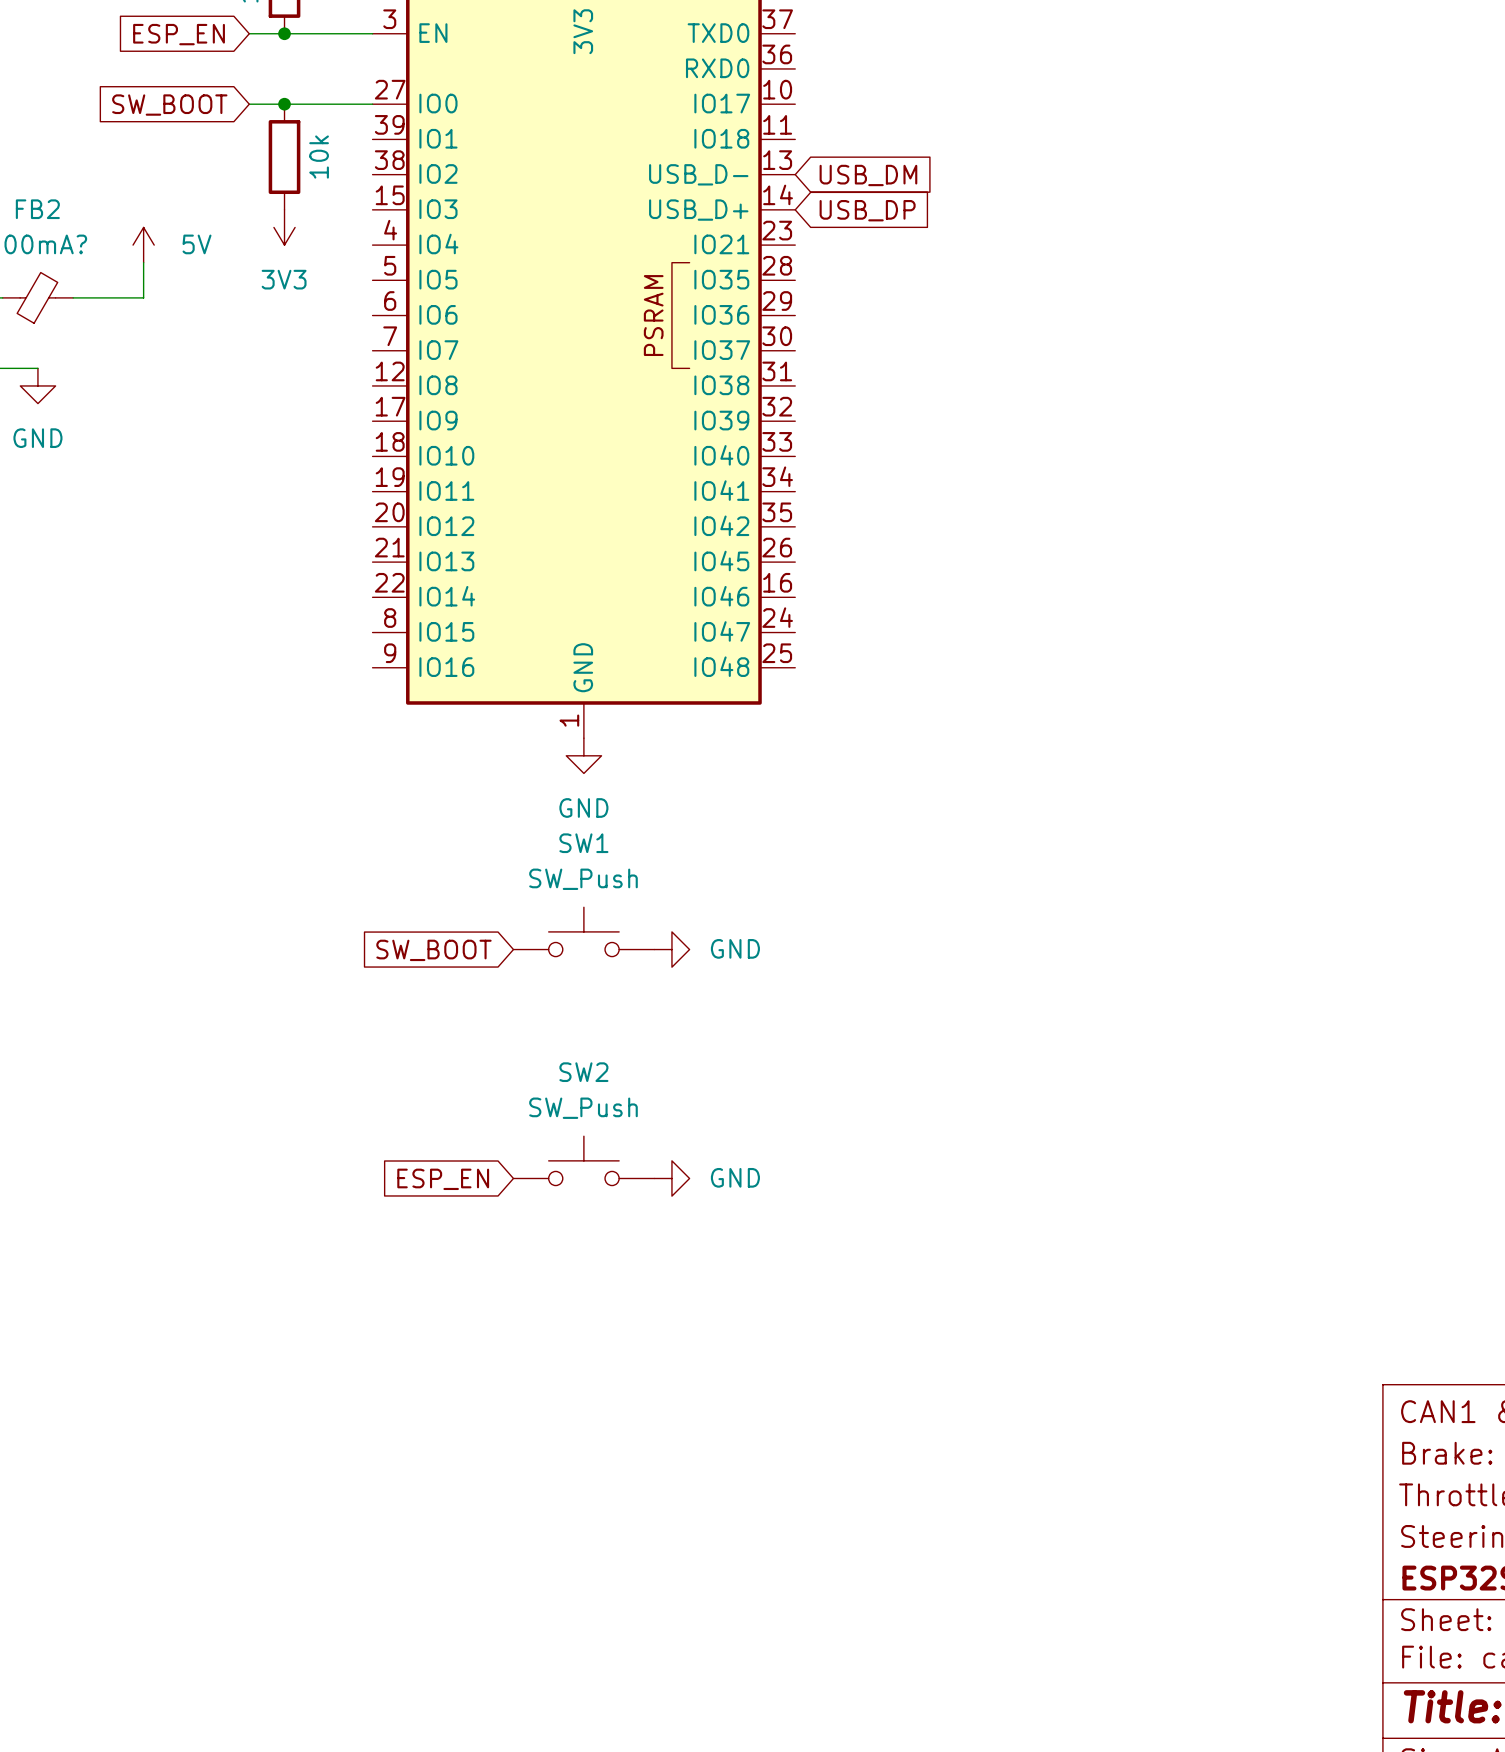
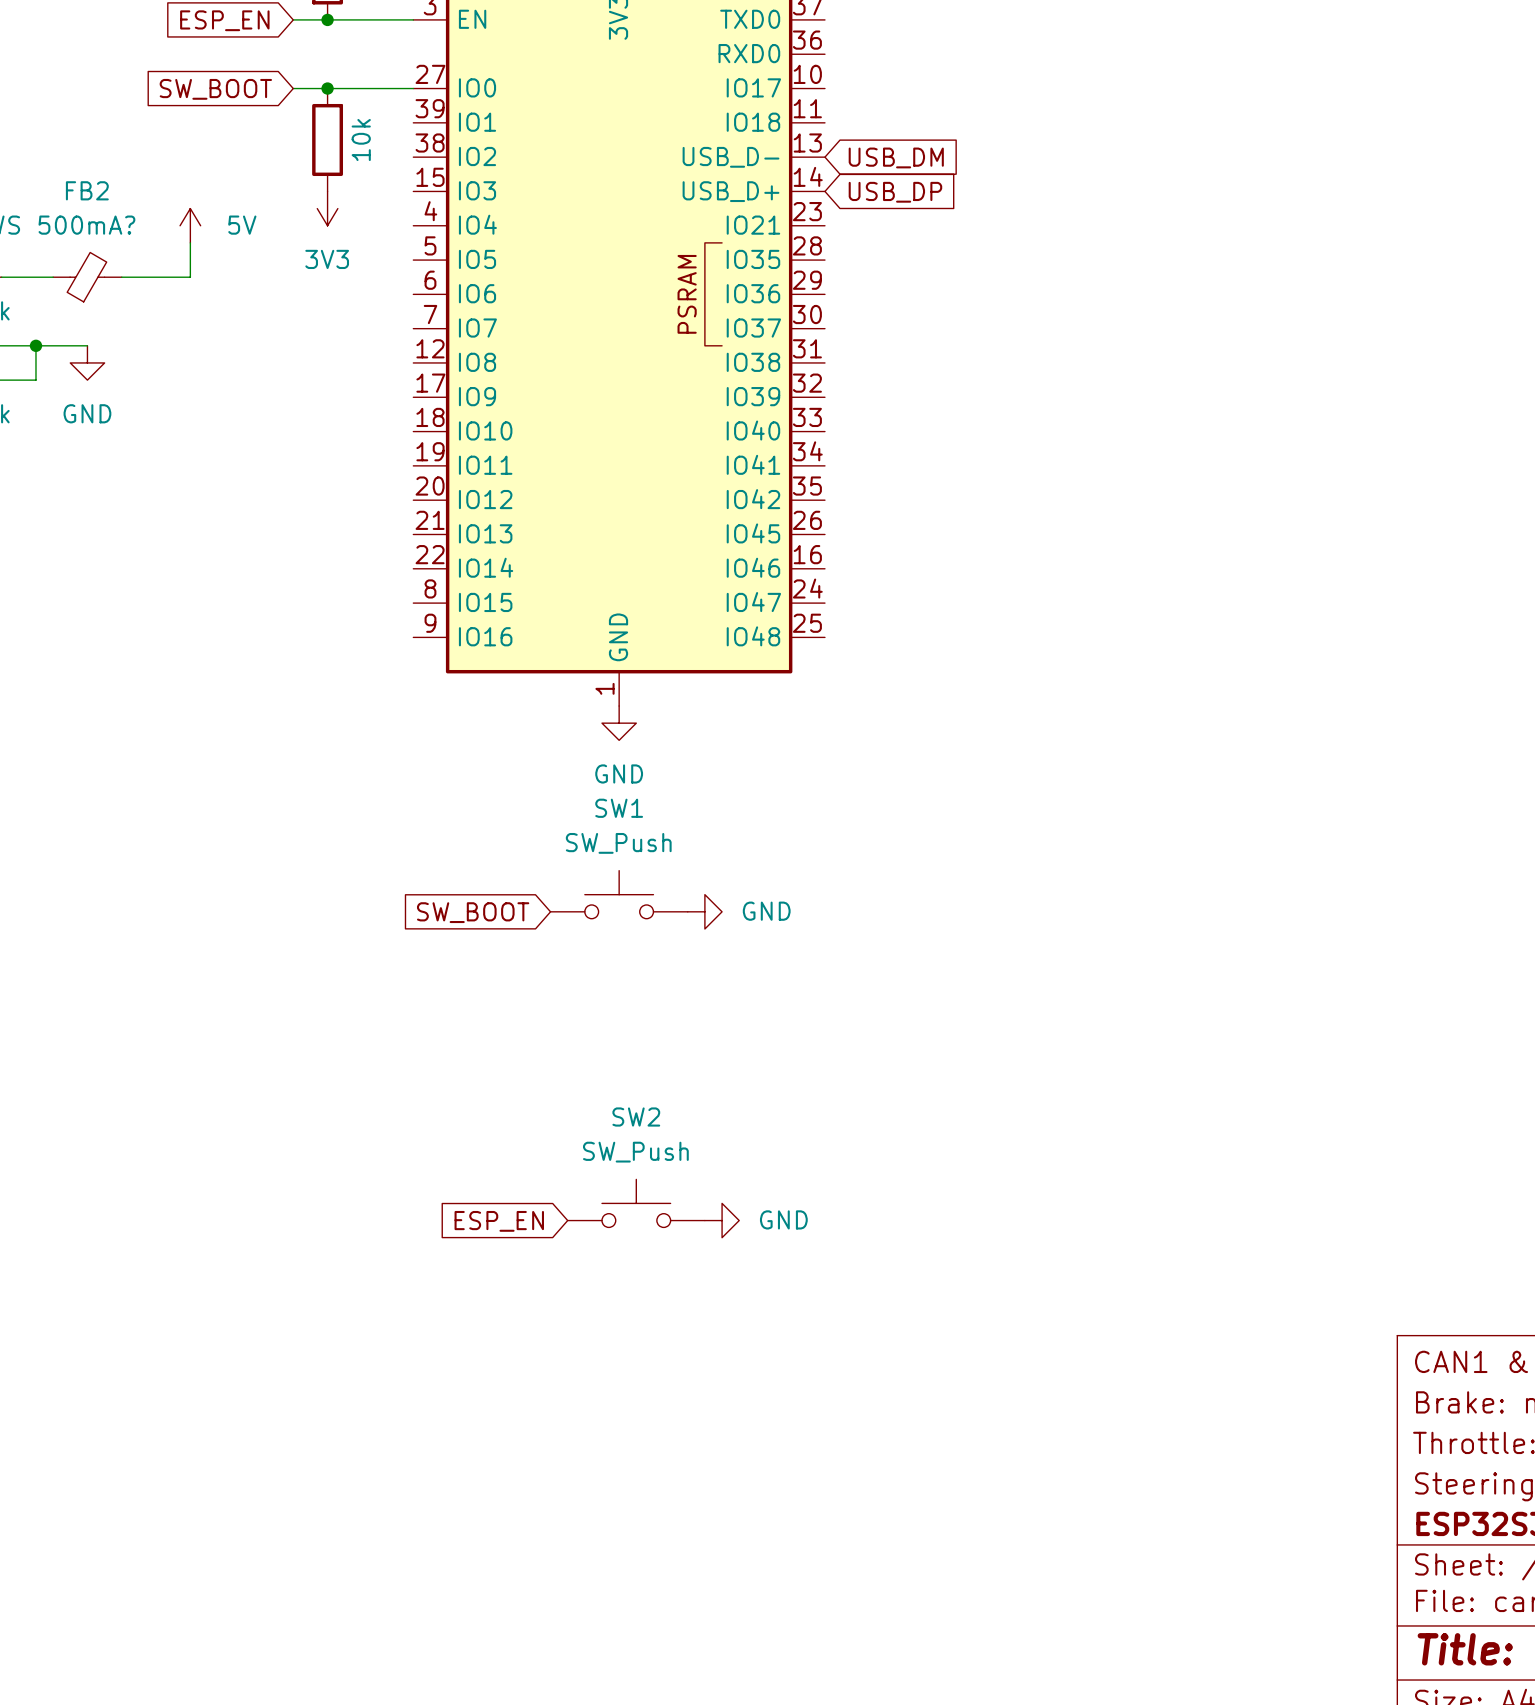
SW2 position: (583, 1160) -> (636, 1203)
power symbol position: GND (671, 1178) -> GND (722, 1220)
global label position: ESP_EN (443, 1179) -> ESP_EN (499, 1221)

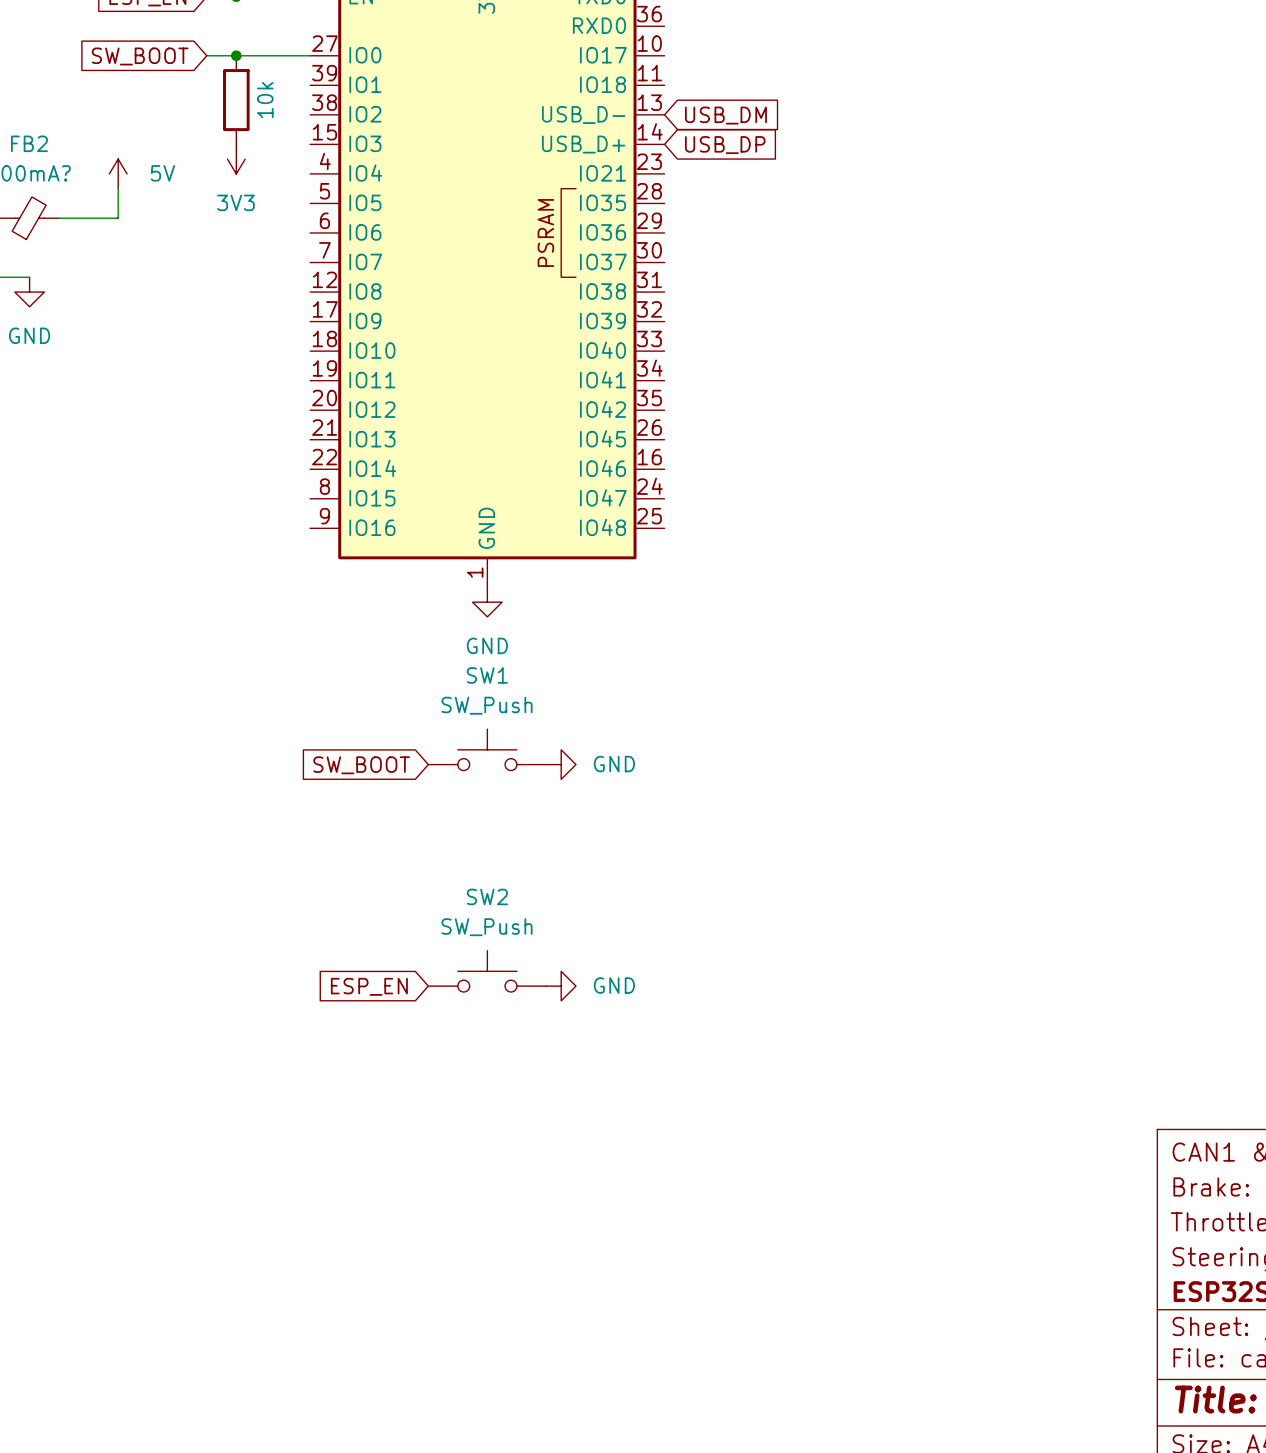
SW2 position: (636, 1203) -> (487, 971)
power symbol position: GND (722, 1220) -> GND (561, 986)
global label position: ESP_EN (499, 1221) -> ESP_EN (369, 986)

